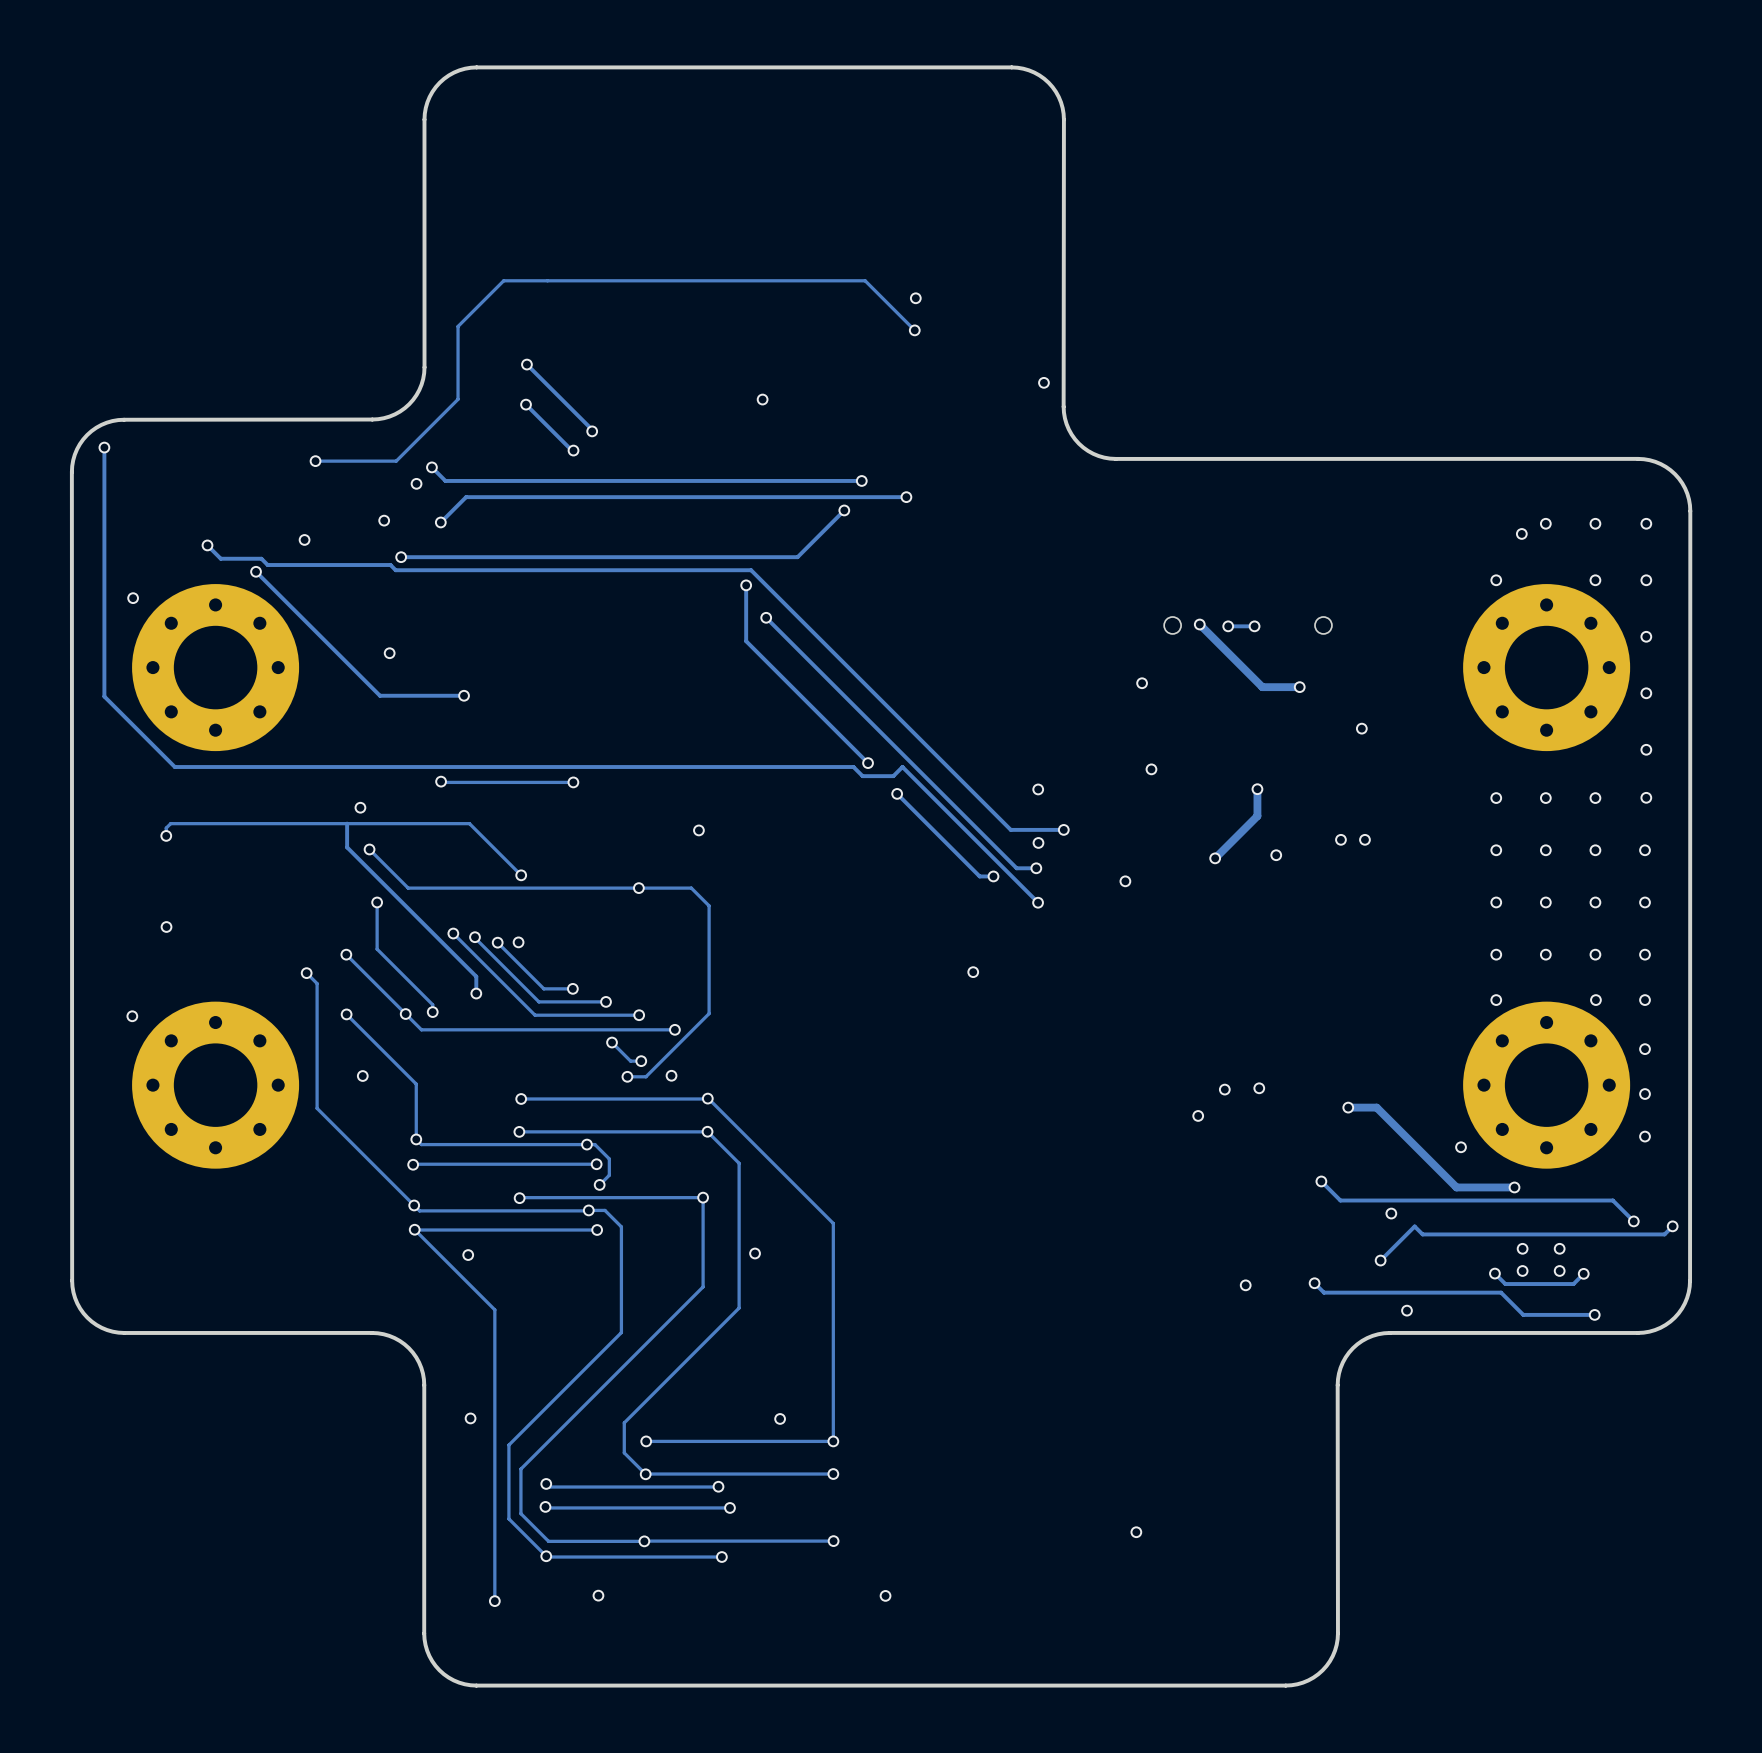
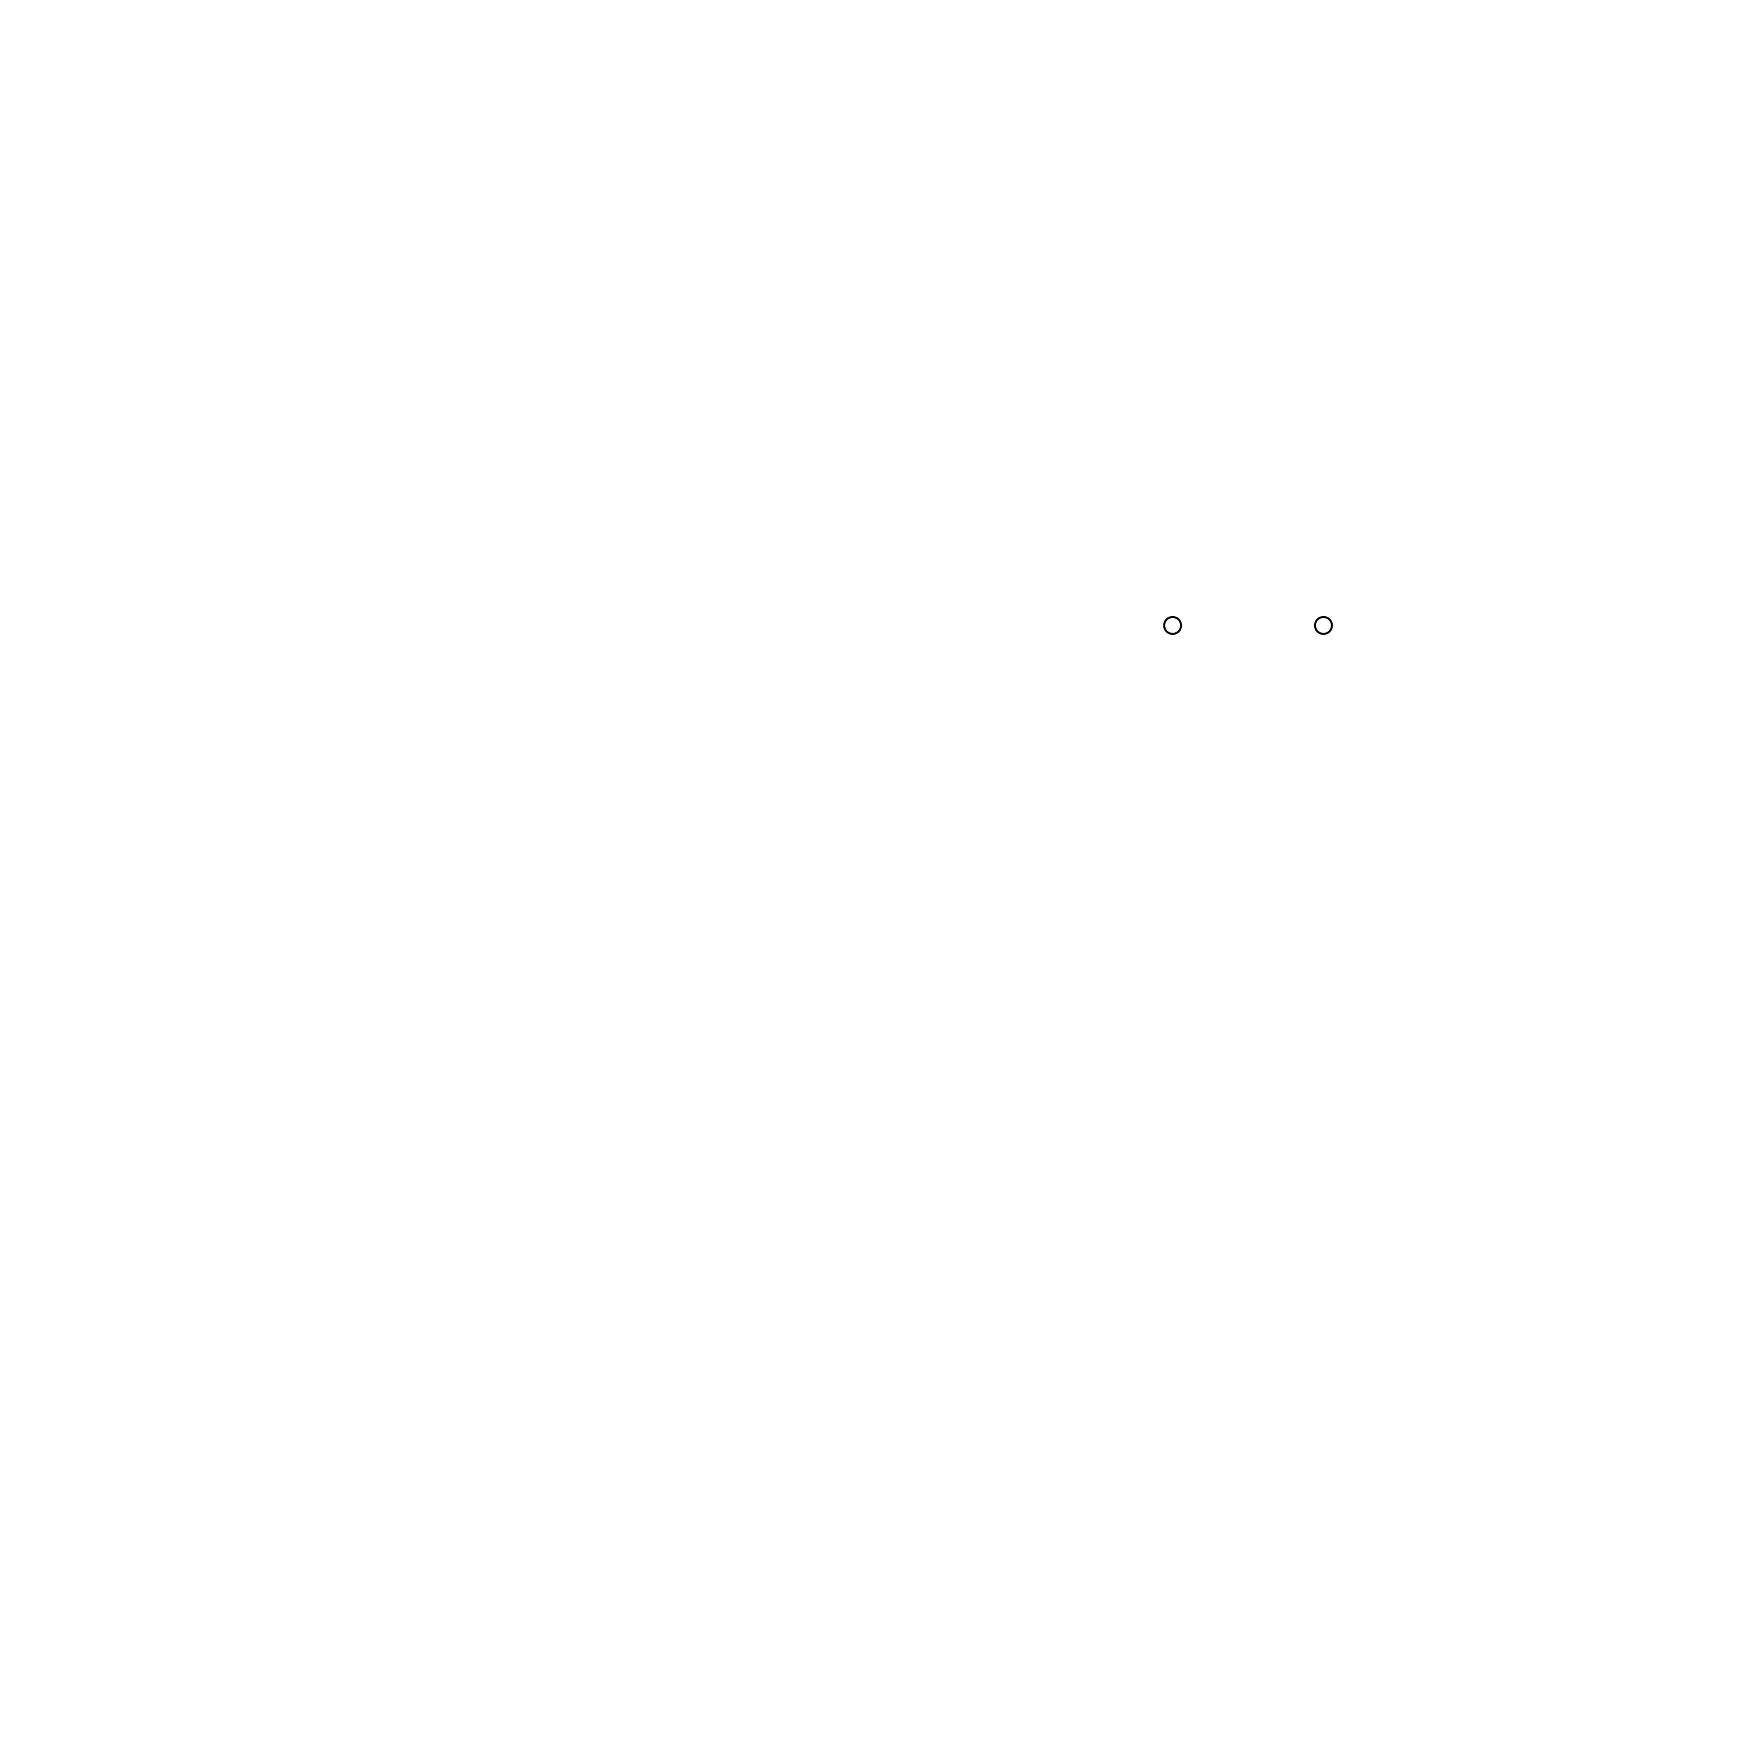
board edge: (1011, 67) (476, 67) (459, 70) (448, 75) (435, 87) (427, 102) (424, 113) (424, 367) (421, 384) (409, 404) (394, 414) (372, 419) (118, 420) (101, 424) (91, 431) (83, 439) (74, 454) (71, 471) (72, 1280) (75, 1298) (80, 1308) (91, 1321) (101, 1327) (118, 1332) (372, 1332) (394, 1338) (408, 1348) (421, 1367) (424, 1385) (424, 1639) (427, 1650) (435, 1665) (448, 1677) (459, 1682) (476, 1685) (1285, 1685) (1303, 1682) (1318, 1674) (1326, 1665) (1335, 1650) (1337, 1639) (1337, 1385) (1342, 1362) (1352, 1348) (1367, 1338) (1389, 1332) (1643, 1332) (1660, 1327) (1670, 1321) (1682, 1308) (1687, 1298) (1690, 1280) (1690, 511) (1685, 488) (1678, 478) (1665, 466) (1643, 459) (1115, 458) (1104, 457) (1088, 450) (1071, 434) (1063, 412) (1062, 107) (1055, 91) (1044, 78) (1028, 70) (1011, 67) -> none
via: (915, 298) -> none
track: (914, 330) (865, 280) (503, 280) (458, 326) (458, 399) (396, 461) (315, 461) -> none
via: (914, 330) -> none
track: (526, 364) (592, 431) -> none
via: (526, 364) -> none
via: (1043, 382) -> none
via: (762, 399) -> none
track: (526, 404) (573, 450) -> none
via: (526, 404) -> none
via: (592, 431) -> none
track: (104, 447) (104, 696) (174, 767) (853, 767) (862, 776) (893, 776) (902, 767) (1038, 902) -> none
via: (104, 447) -> none
via: (573, 450) -> none
via: (315, 461) -> none
track: (431, 467) (445, 480) (861, 480) -> none
via: (431, 467) -> none
via: (861, 480) -> none
via: (416, 483) -> none
track: (906, 497) (466, 497) (440, 522) -> none
via: (906, 497) -> none
track: (844, 510) (797, 557) (401, 557) -> none
via: (844, 510) -> none
via: (384, 520) -> none
via: (440, 522) -> none
via: (1545, 523) -> none
via: (1595, 523) -> none
via: (1646, 523) -> none
via: (1521, 533) -> none
via: (304, 539) -> none
track: (207, 545) (220, 558) (261, 558) (267, 565) (390, 565) (395, 570) (751, 570) (1010, 829) (1063, 829) -> none
via: (207, 545) -> none
via: (401, 557) -> none
track: (256, 571) (380, 695) (464, 695) -> none
via: (256, 571) -> none
via: (1496, 580) -> none
via: (1595, 580) -> none
via: (1646, 580) -> none
track: (746, 585) (746, 641) (868, 763) -> none
via: (746, 585) -> none
via: (133, 598) -> none
track: (766, 617) (1016, 868) (1036, 868) -> none
via: (766, 617) -> none
track: (1199, 624) (1262, 687) (1299, 687) -> none
via: (1199, 624) -> none
via: (1228, 626) -> none
track: (1254, 626) (1228, 626) -> none
via: (1254, 626) -> none
via: (1646, 636) -> none
via: (389, 653) -> none
part: (215, 667) -> none
part: (1546, 667) -> none
via: (1142, 683) -> none
via: (1299, 687) -> none
via: (1646, 693) -> none
via: (464, 695) -> none
via: (1361, 728) -> none
via: (1646, 749) -> none
via: (868, 763) -> none
via: (1151, 769) -> none
track: (441, 781) (573, 782) -> none
via: (441, 781) -> none
via: (573, 782) -> none
via: (1038, 789) -> none
track: (1257, 789) (1257, 816) (1215, 858) -> none
via: (1257, 789) -> none
track: (897, 793) (979, 876) (993, 876) -> none
via: (897, 793) -> none
via: (1646, 797) -> none
via: (1496, 798) -> none
via: (1545, 798) -> none
via: (1595, 798) -> none
via: (360, 807) -> none
track: (347, 823) (347, 847) (476, 976) (476, 993) -> none
via: (1063, 829) -> none
via: (698, 830) -> none
track: (166, 835) (166, 828) (170, 823) (469, 823) (521, 875) -> none
via: (166, 835) -> none
via: (1340, 839) -> none
via: (1364, 839) -> none
via: (1038, 842) -> none
track: (369, 849) (408, 888) (691, 888) (709, 905) (709, 1013) (645, 1076) (627, 1076) -> none
via: (369, 849) -> none
via: (1496, 850) -> none
via: (1545, 850) -> none
via: (1595, 850) -> none
via: (1645, 850) -> none
via: (1276, 855) -> none
via: (1215, 858) -> none
via: (1036, 868) -> none
via: (521, 875) -> none
via: (993, 876) -> none
via: (1125, 881) -> none
via: (638, 888) -> none
track: (377, 902) (377, 949) (432, 1004) (432, 1012) -> none
via: (377, 902) -> none
via: (1038, 902) -> none
via: (1496, 902) -> none
via: (1545, 902) -> none
via: (1595, 902) -> none
via: (1645, 902) -> none
via: (166, 926) -> none
track: (453, 933) (535, 1015) (639, 1015) -> none
via: (453, 933) -> none
track: (474, 937) (538, 1001) (606, 1001) -> none
via: (474, 937) -> none
track: (497, 942) (543, 988) (572, 988) -> none
via: (497, 942) -> none
via: (518, 942) -> none
track: (346, 954) (421, 1029) (674, 1029) -> none
via: (346, 954) -> none
via: (1496, 954) -> none
via: (1545, 954) -> none
via: (1595, 954) -> none
via: (1645, 954) -> none
via: (973, 972) -> none
track: (306, 973) (317, 983) (317, 1108) (419, 1210) (604, 1210) (621, 1226) (621, 1332) (508, 1445) (508, 1518) (547, 1557) (721, 1557) -> none
via: (306, 973) -> none
via: (572, 988) -> none
via: (476, 993) -> none
via: (1496, 1000) -> none
via: (1595, 1000) -> none
via: (1645, 1000) -> none
via: (606, 1001) -> none
via: (432, 1012) -> none
track: (346, 1014) (416, 1084) (416, 1139) (421, 1144) (594, 1144) (609, 1158) (609, 1175) (599, 1184) -> none
via: (346, 1014) -> none
via: (405, 1014) -> none
via: (639, 1015) -> none
via: (132, 1016) -> none
via: (674, 1029) -> none
track: (612, 1042) (630, 1061) (641, 1061) -> none
via: (612, 1042) -> none
via: (1645, 1049) -> none
via: (641, 1061) -> none
via: (671, 1075) -> none
via: (362, 1076) -> none
via: (627, 1076) -> none
part: (215, 1085) -> none
part: (1546, 1085) -> none
via: (1259, 1088) -> none
via: (1224, 1089) -> none
via: (1645, 1094) -> none
track: (521, 1098) (708, 1098) (833, 1223) (833, 1441) (646, 1441) -> none
via: (521, 1098) -> none
via: (707, 1098) -> none
track: (1348, 1107) (1376, 1107) (1456, 1187) (1514, 1187) -> none
via: (1348, 1107) -> none
via: (1198, 1115) -> none
via: (519, 1131) -> none
track: (707, 1131) (739, 1163) (739, 1308) (624, 1422) (624, 1452) (645, 1474) -> none
track: (707, 1131) (519, 1131) -> none
via: (707, 1131) -> none
via: (1645, 1136) -> none
via: (416, 1139) -> none
via: (586, 1144) -> none
via: (1461, 1147) -> none
via: (413, 1164) -> none
track: (596, 1164) (413, 1164) -> none
via: (596, 1164) -> none
track: (1321, 1181) (1340, 1200) (1612, 1200) (1633, 1221) -> none
via: (1321, 1181) -> none
via: (599, 1184) -> none
via: (1514, 1187) -> none
via: (703, 1197) -> none
track: (519, 1198) (703, 1197) (703, 1286) (520, 1469) (520, 1513) (548, 1541) (644, 1541) -> none
via: (519, 1198) -> none
via: (414, 1205) -> none
via: (588, 1210) -> none
via: (1391, 1213) -> none
via: (1633, 1221) -> none
track: (1672, 1226) (1664, 1234) (1422, 1234) (1414, 1226) (1380, 1260) -> none
via: (1672, 1226) -> none
track: (414, 1229) (494, 1309) (494, 1601) -> none
via: (414, 1229) -> none
track: (597, 1230) (414, 1230) -> none
via: (597, 1230) -> none
via: (1522, 1248) -> none
via: (1559, 1248) -> none
via: (755, 1253) -> none
via: (468, 1255) -> none
via: (1380, 1260) -> none
via: (1522, 1270) -> none
via: (1559, 1270) -> none
track: (1494, 1273) (1505, 1284) (1573, 1284) (1583, 1273) -> none
via: (1494, 1273) -> none
via: (1583, 1273) -> none
track: (1314, 1283) (1323, 1292) (1501, 1292) (1523, 1314) (1594, 1314) -> none
via: (1314, 1283) -> none
via: (1245, 1285) -> none
via: (1406, 1310) -> none
via: (1594, 1314) -> none
via: (470, 1418) -> none
via: (780, 1418) -> none
via: (646, 1441) -> none
via: (833, 1441) -> none
via: (645, 1474) -> none
track: (833, 1474) (645, 1474) -> none
via: (833, 1474) -> none
track: (546, 1483) (549, 1487) (718, 1487) -> none
via: (546, 1483) -> none
via: (718, 1486) -> none
track: (545, 1506) (729, 1507) -> none
via: (545, 1506) -> none
via: (729, 1507) -> none
via: (1136, 1532) -> none
via: (644, 1541) -> none
track: (833, 1541) (644, 1541) -> none
via: (833, 1541) -> none
via: (546, 1556) -> none
via: (721, 1557) -> none
via: (598, 1595) -> none
via: (885, 1595) -> none
via: (494, 1601) -> none

